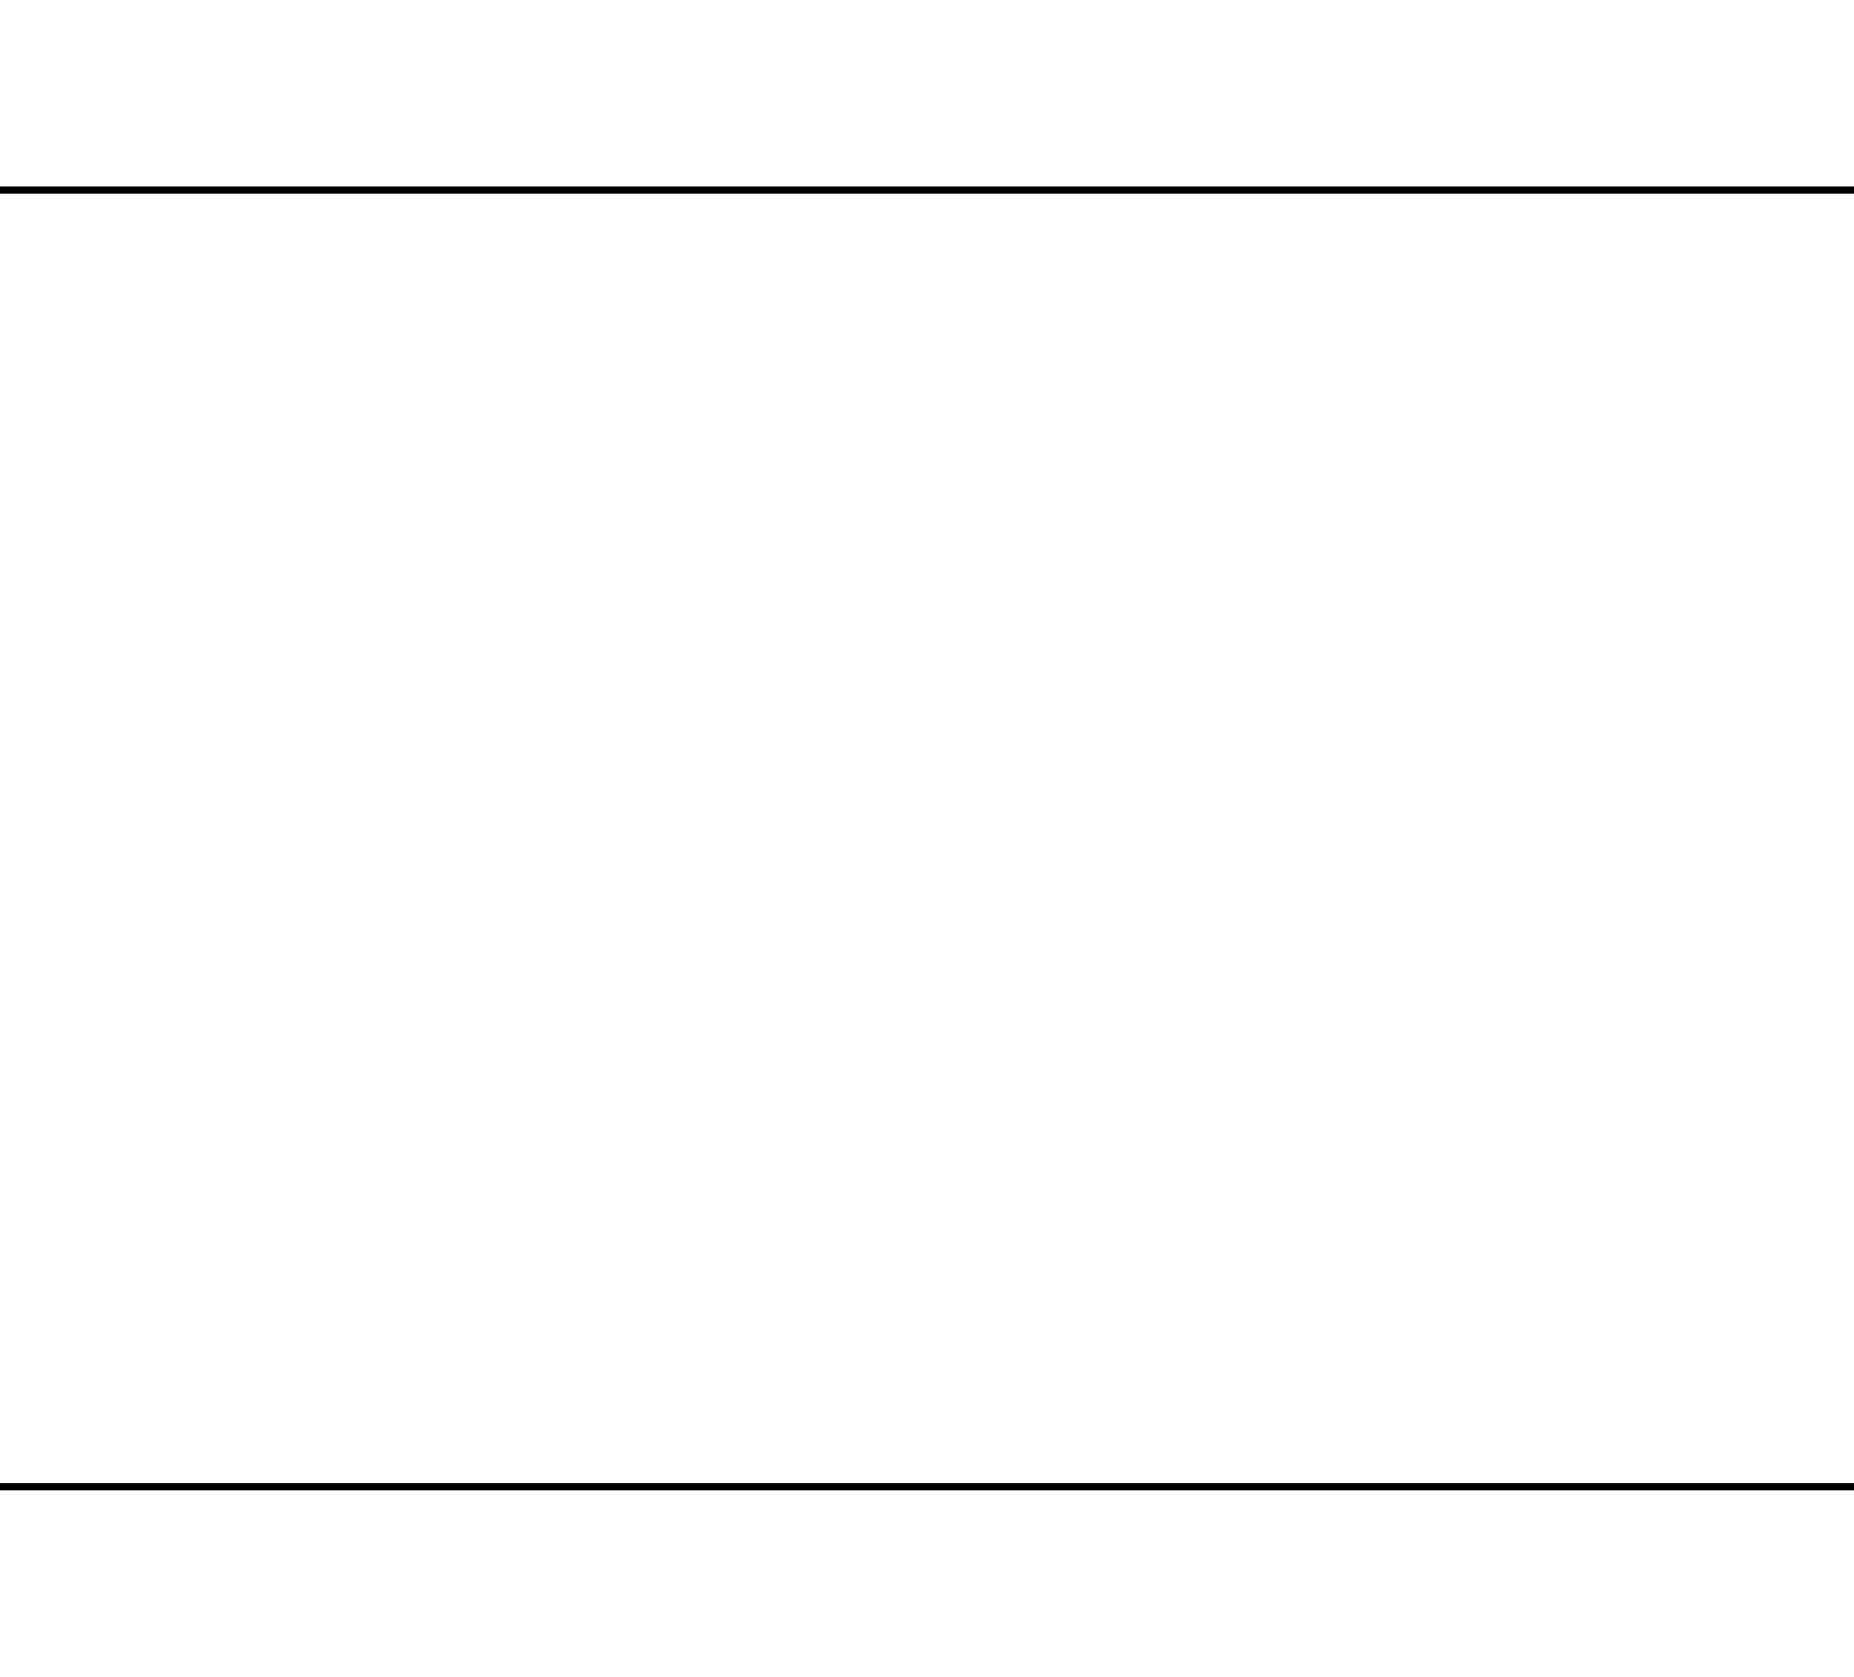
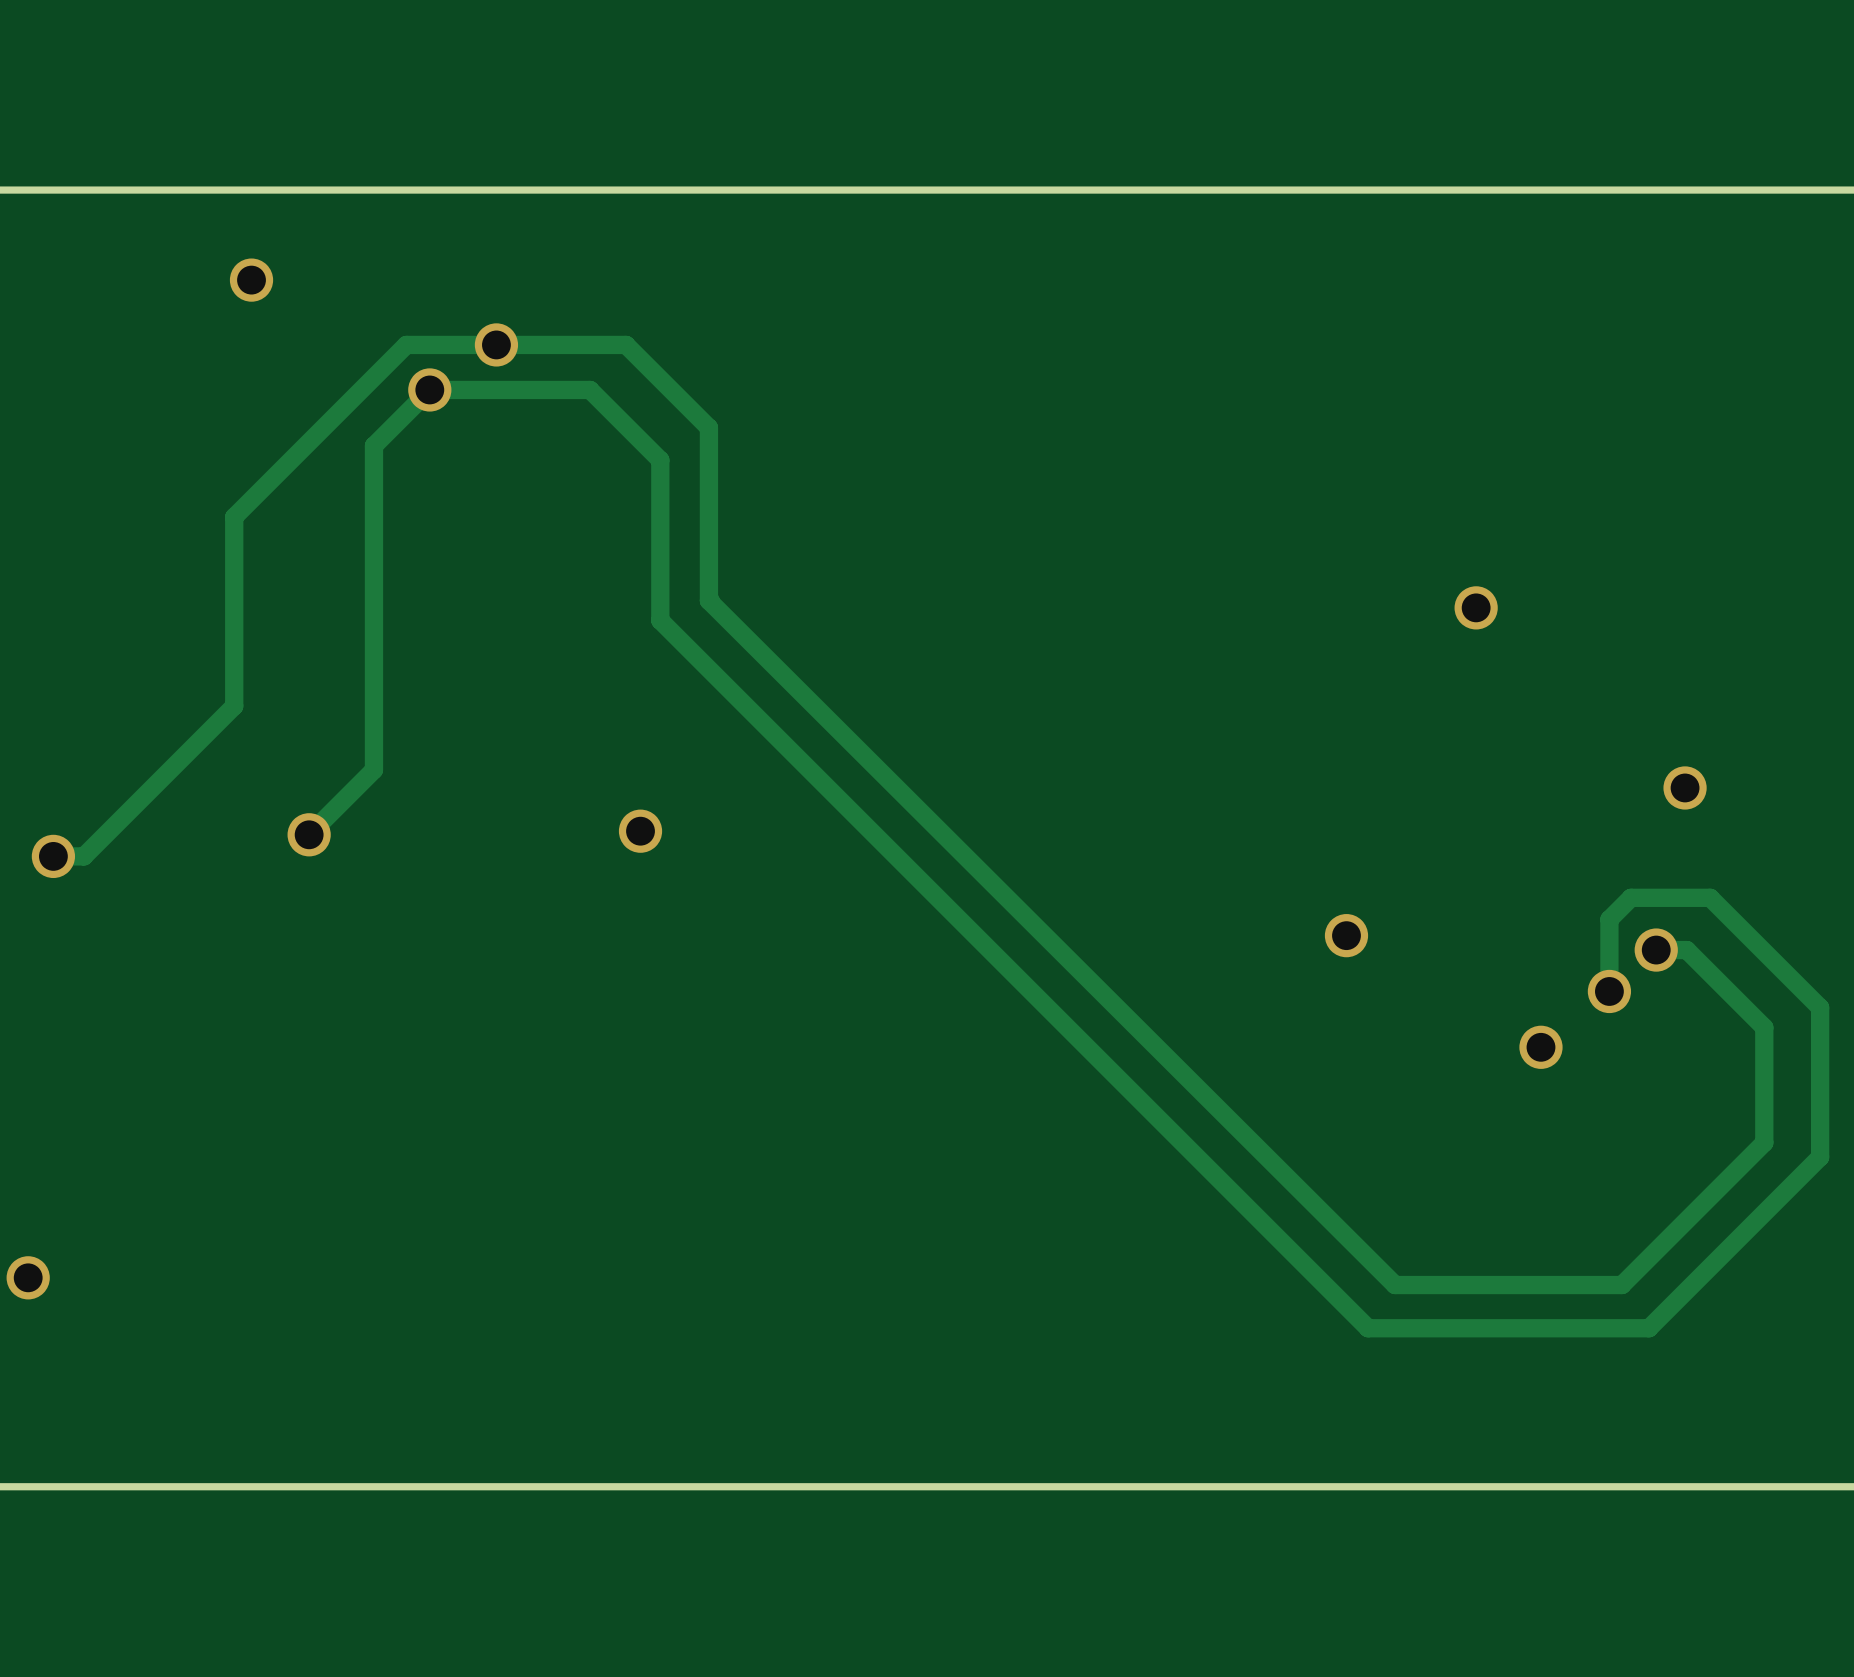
via: none -> (251, 280)
via: none -> (496, 344)
track: none -> (419, 389) (590, 389) (660, 460) (660, 620) (1368, 1328) (1649, 1328) (1820, 1157) (1820, 1007) (1710, 897) (1631, 897) (1609, 919) (1609, 991)
track: none -> (429, 389) (373, 445) (373, 769) (309, 834)
via: none -> (429, 389)
track: none -> (708, 600) (708, 427) (626, 344) (406, 344) (234, 517) (234, 706) (83, 856) (53, 856)
track: none -> (708, 600) (1395, 1285) (1622, 1285) (1764, 1142) (1764, 1027) (1686, 950) (1656, 950)
via: none -> (1476, 607)
via: none -> (1685, 787)
via: none -> (640, 831)
via: none -> (309, 834)
via: none -> (53, 856)
via: none -> (1346, 935)
via: none -> (1656, 950)
via: none -> (1609, 991)
via: none -> (1540, 1047)
via: none -> (28, 1277)

